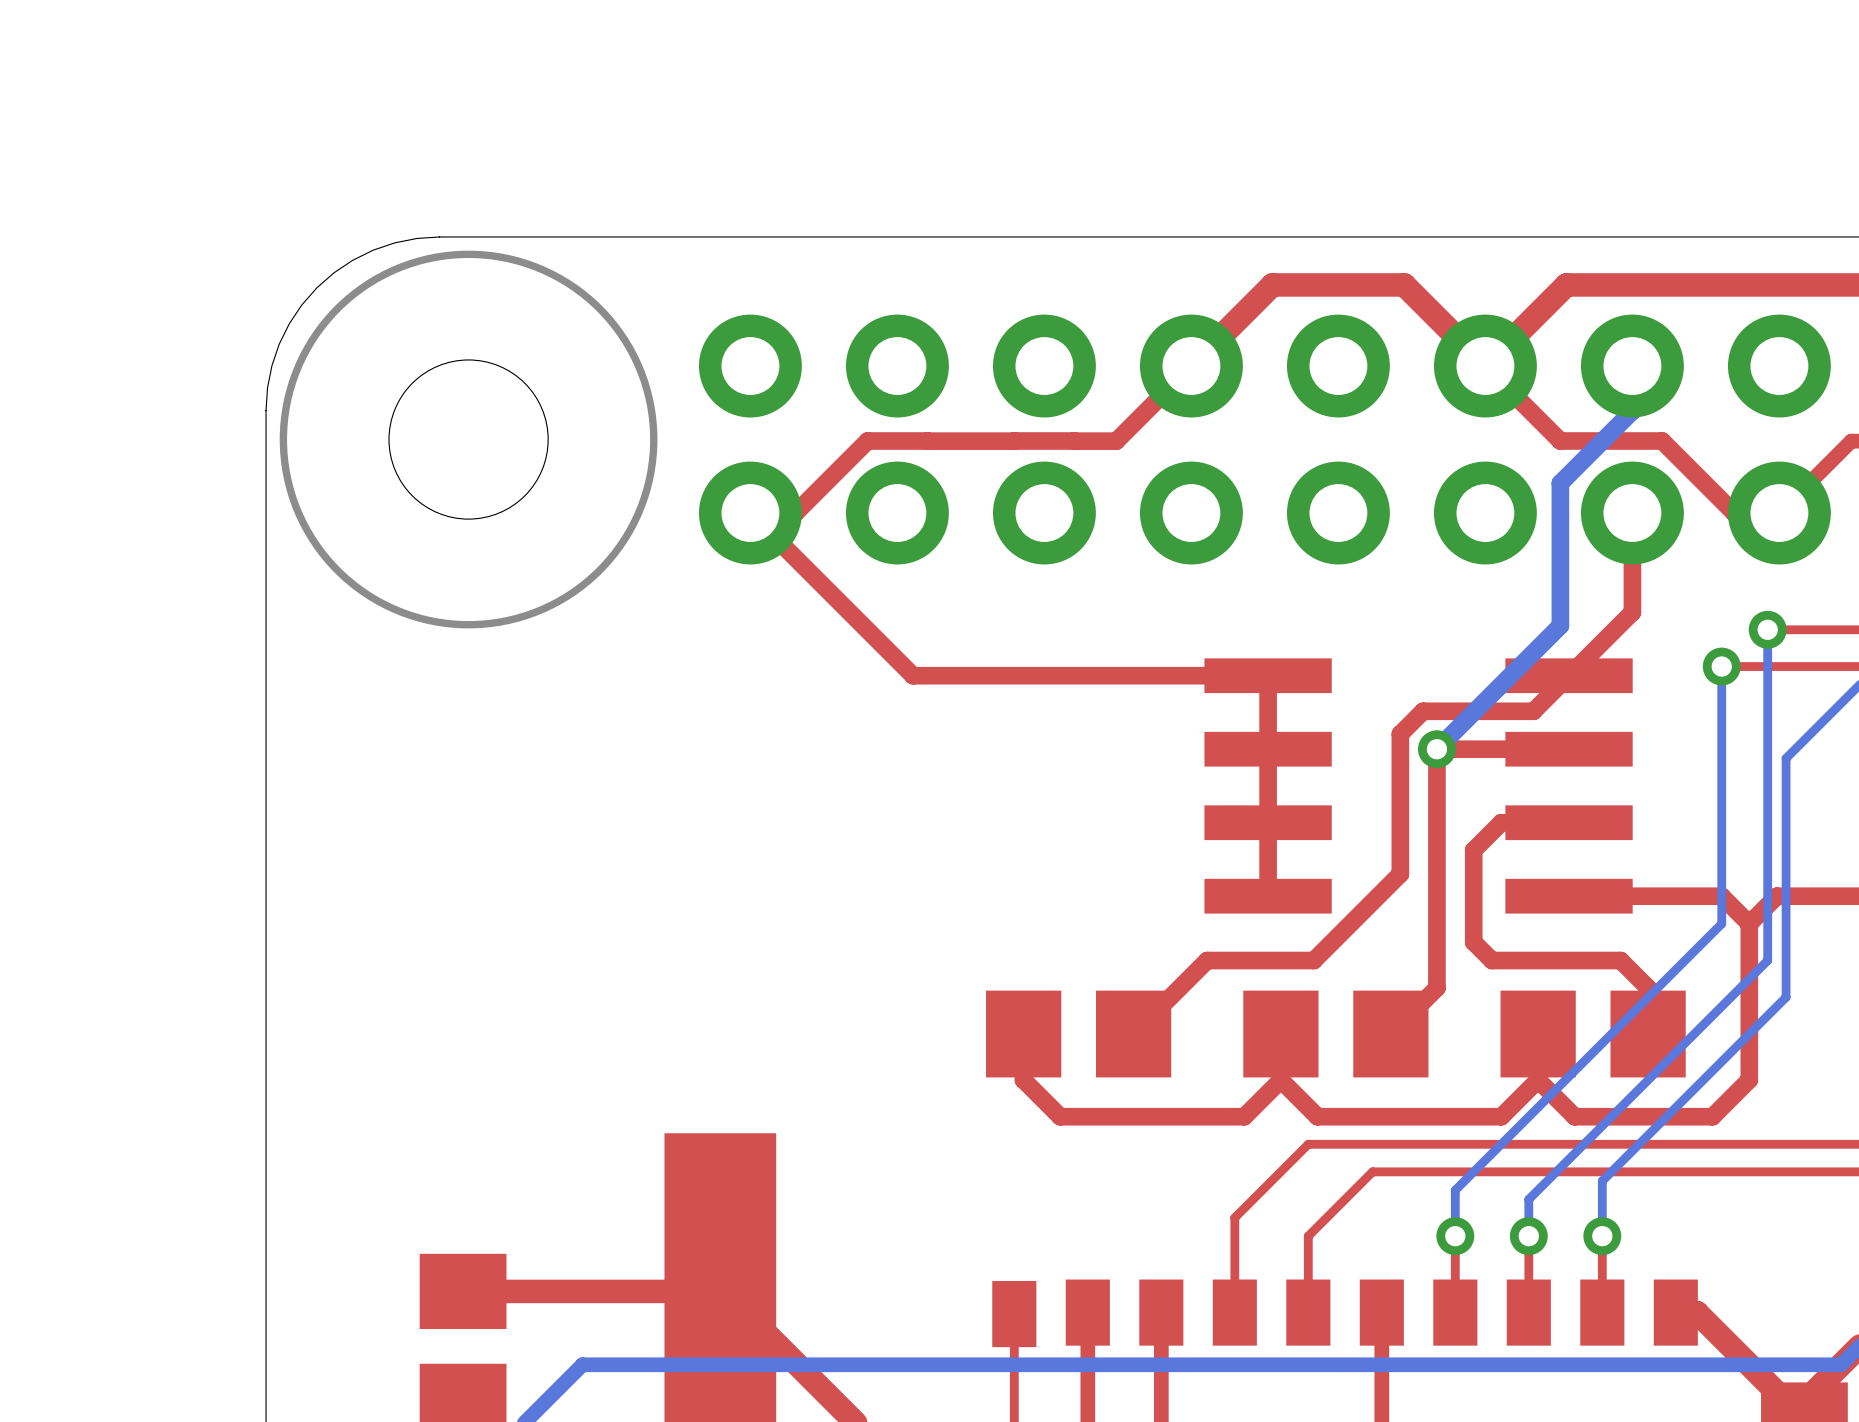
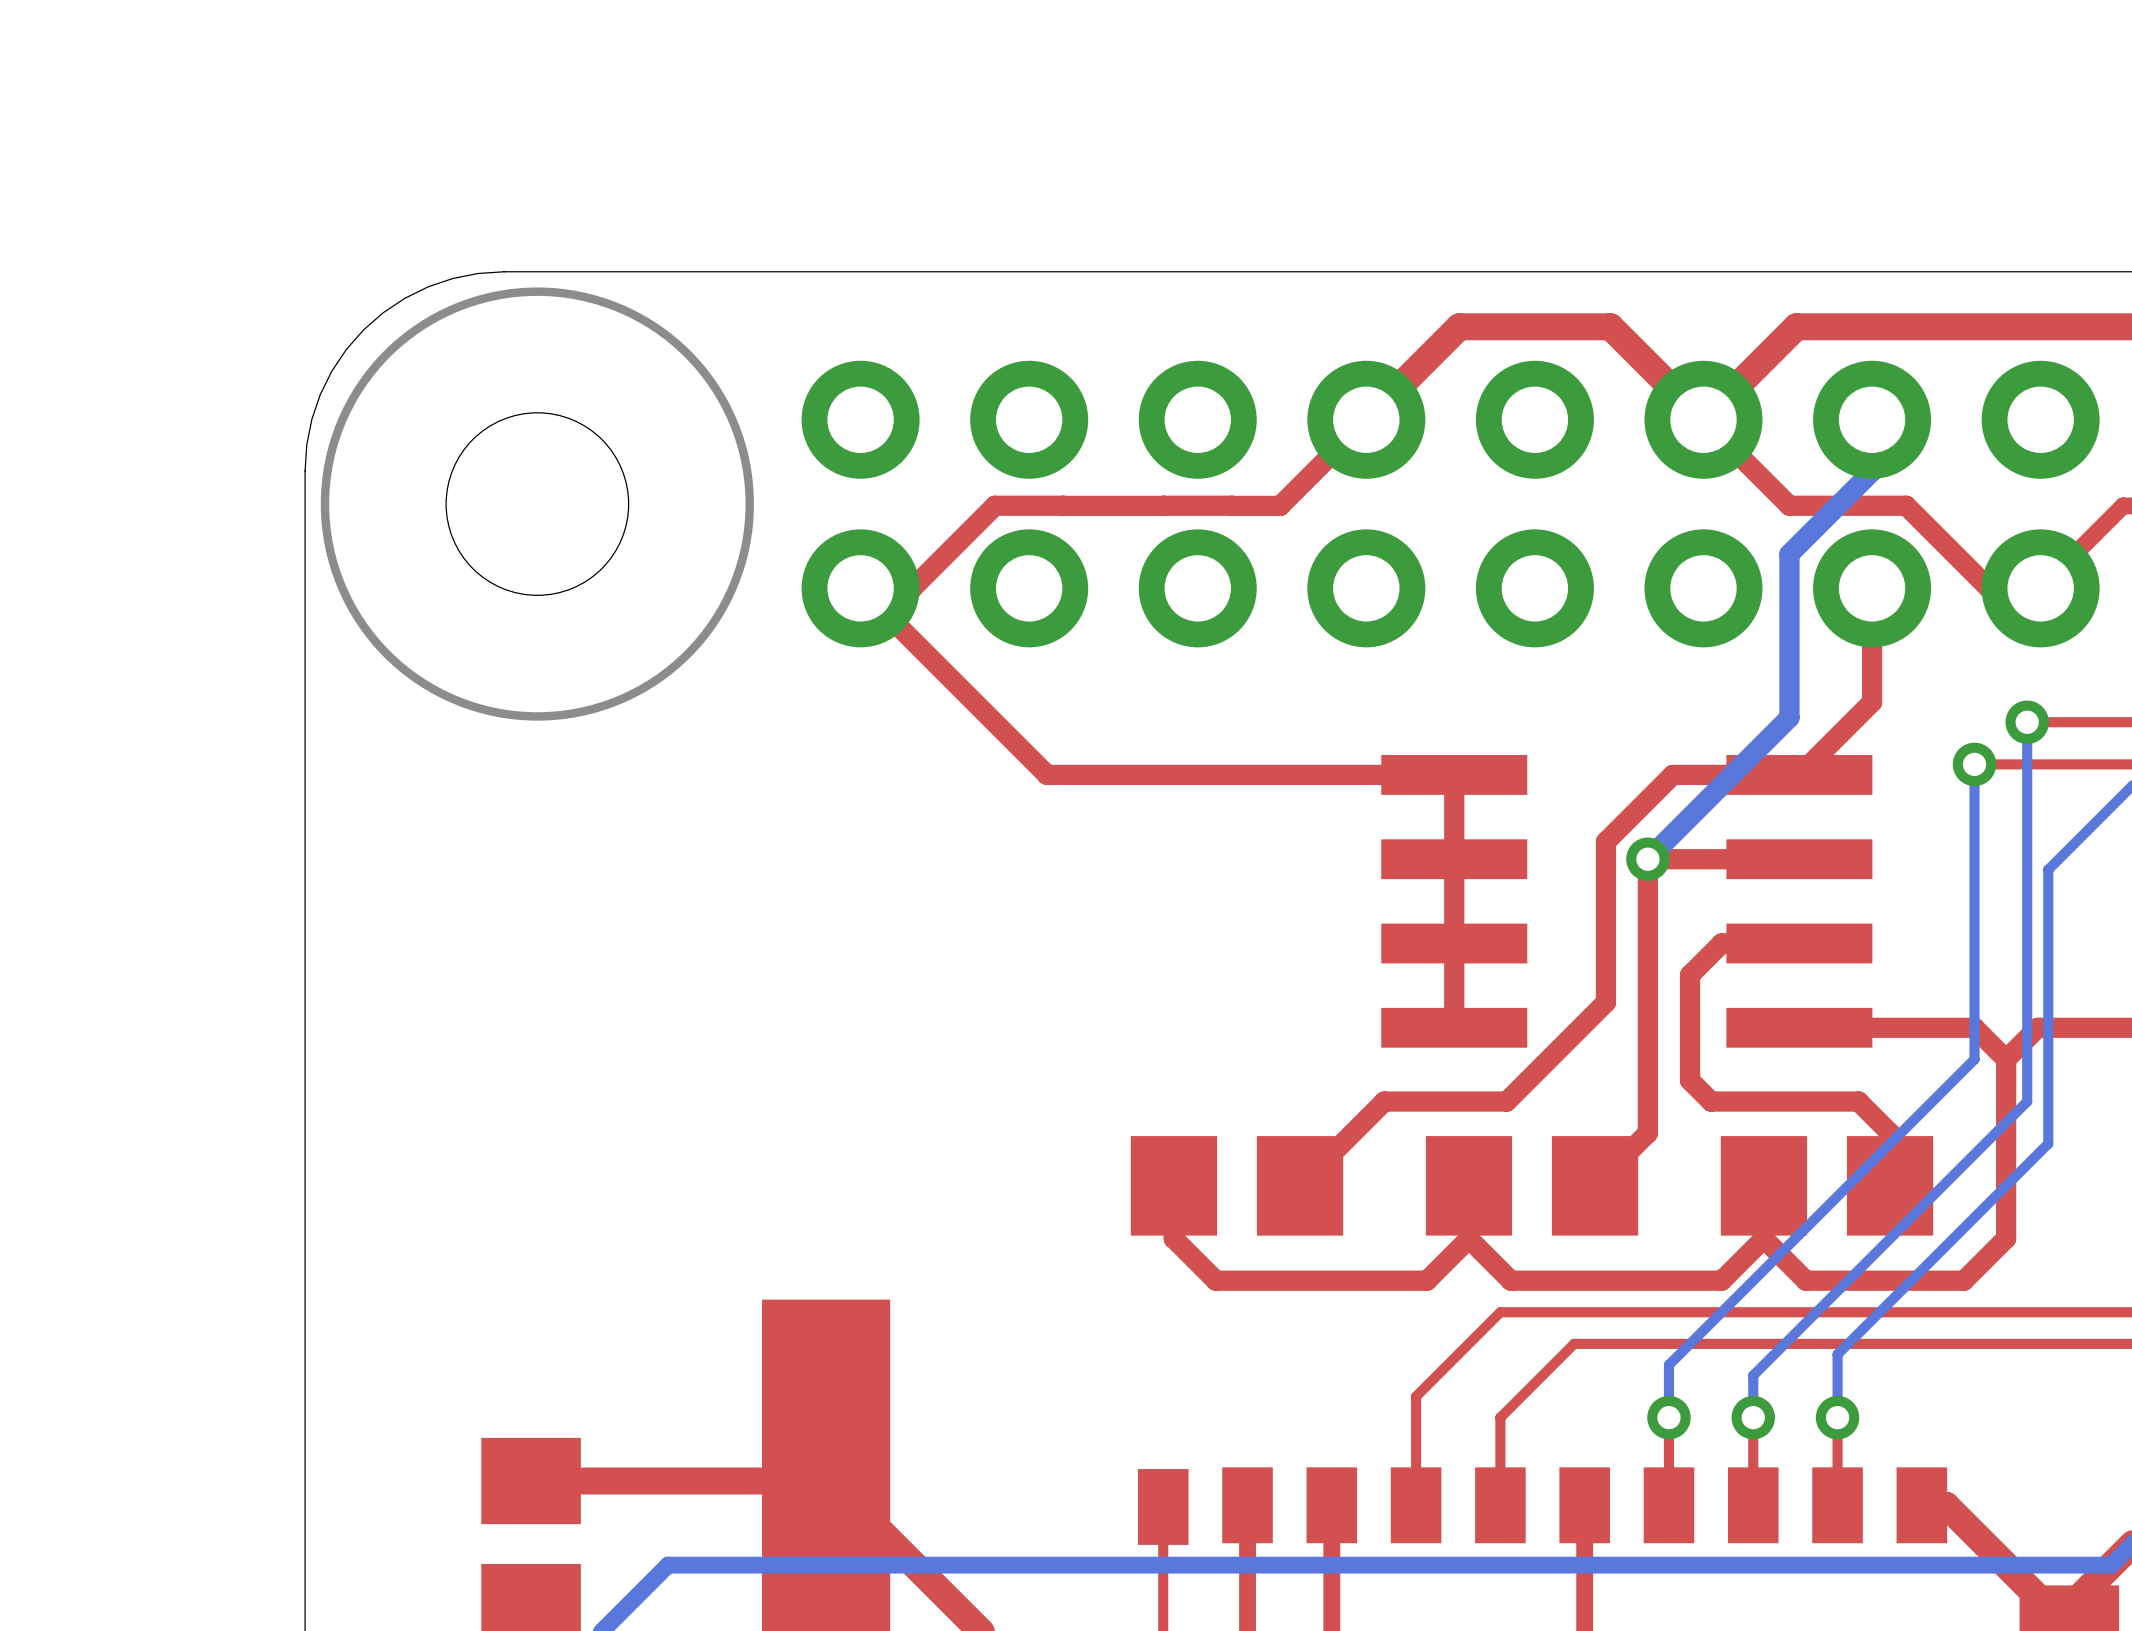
top track: (1569, 675) (1533, 711) (1423, 711) -> (1799, 774) (1672, 774) (1632, 815)

